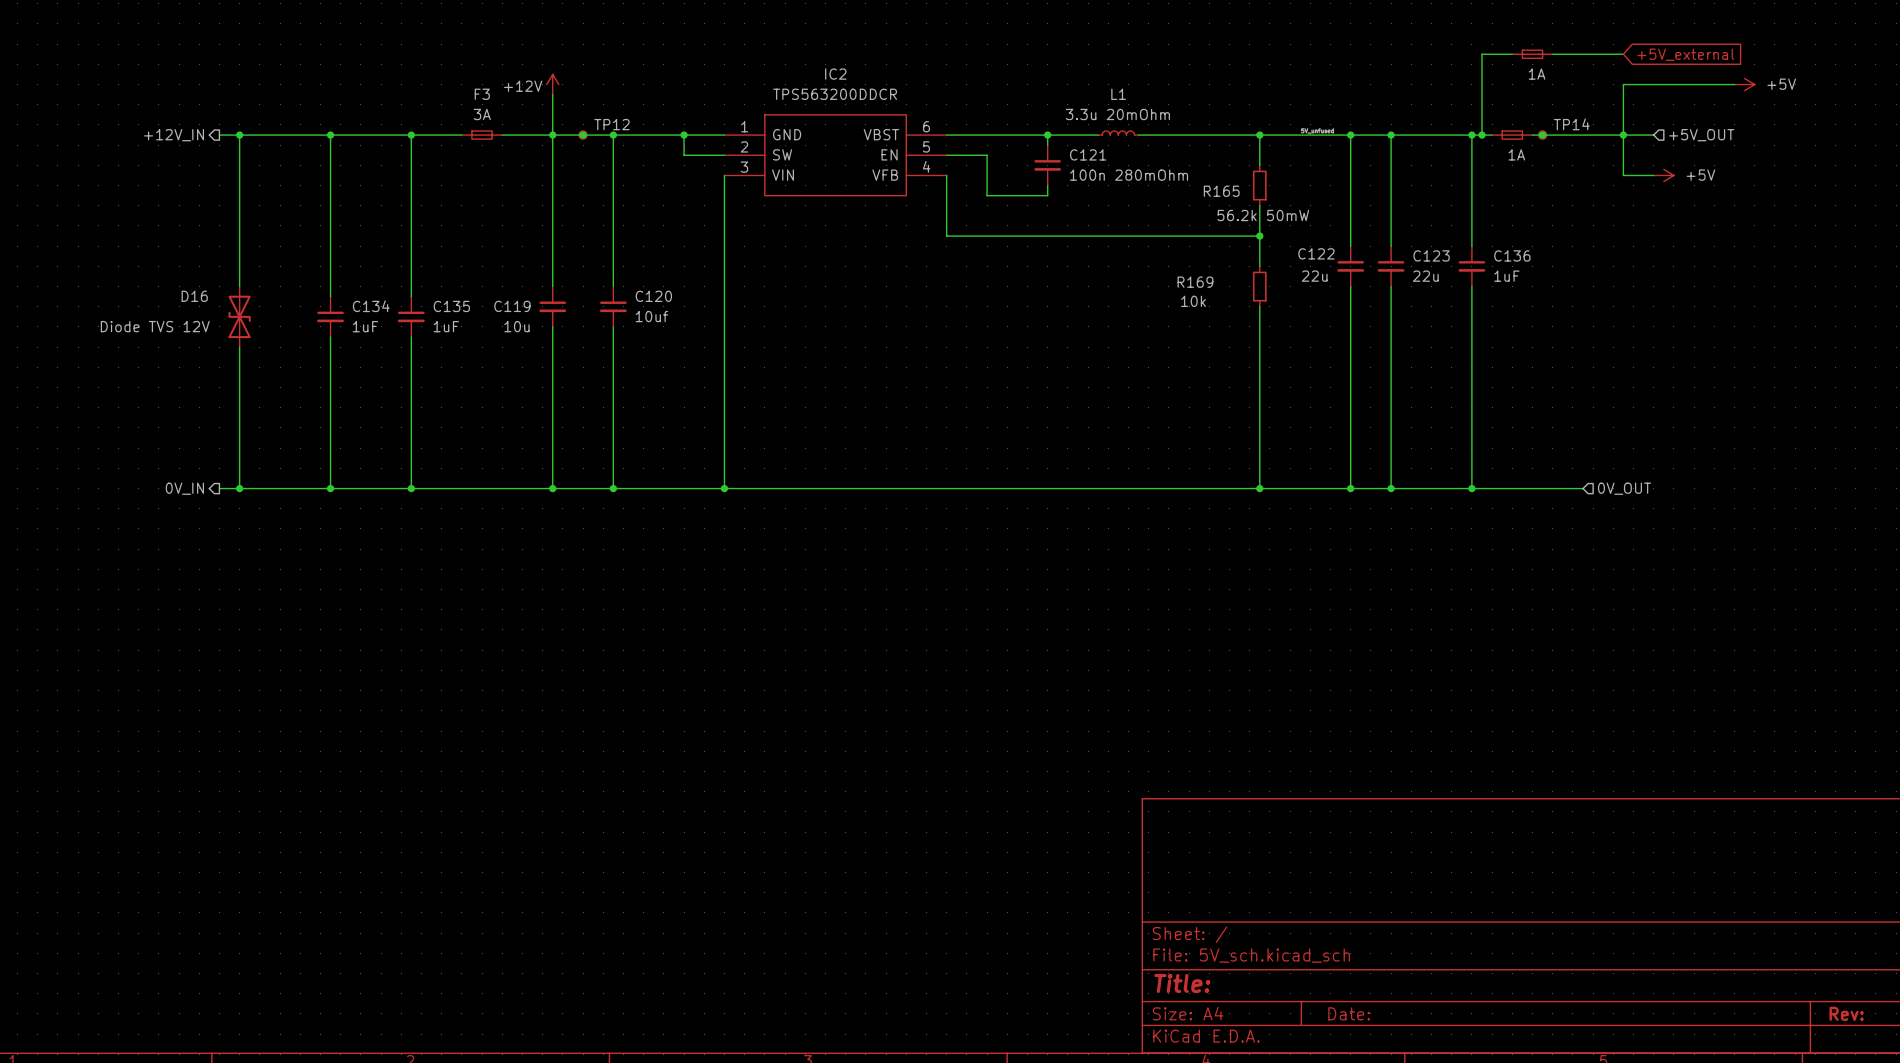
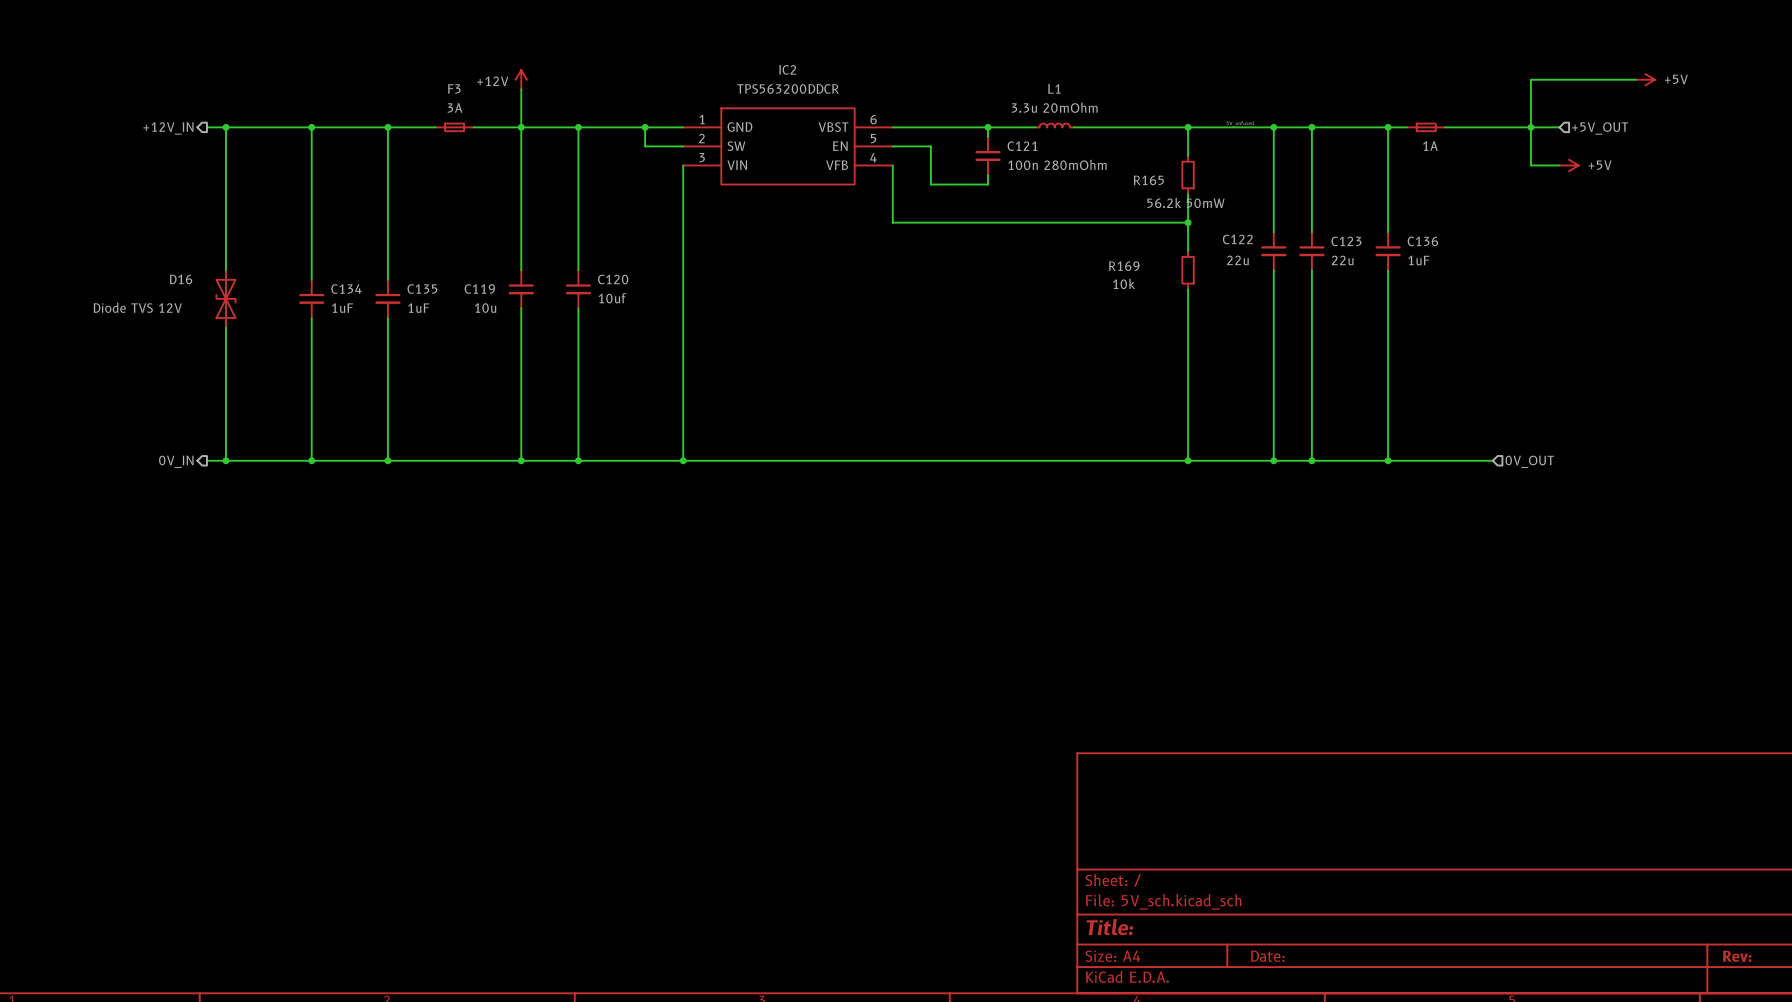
wire: (1512, 54) (1482, 54) (1482, 135) -> none
part: 1A (1532, 54) -> none
wire: (1552, 54) (1623, 54) -> none
global label: +5V_external (1685, 54) -> none
junction: (583, 135) -> none
TP12: (583, 135) -> none
junction: (1482, 135) -> none
junction: (1542, 135) -> none
TP14: (1542, 135) -> none

